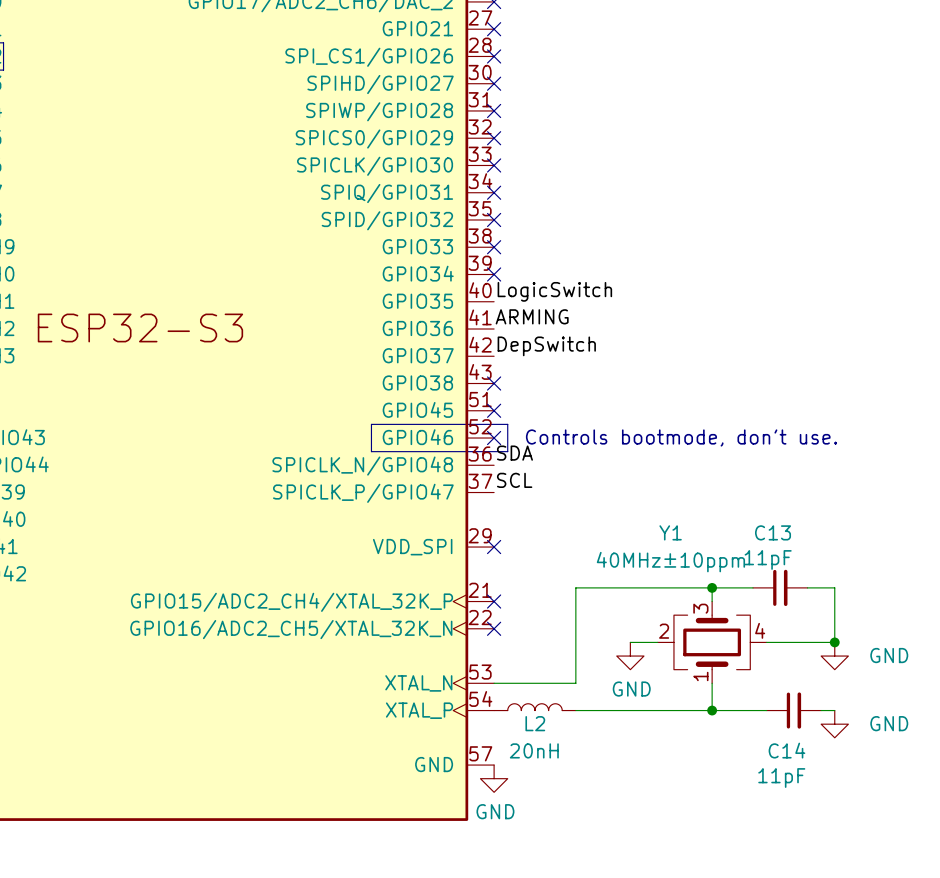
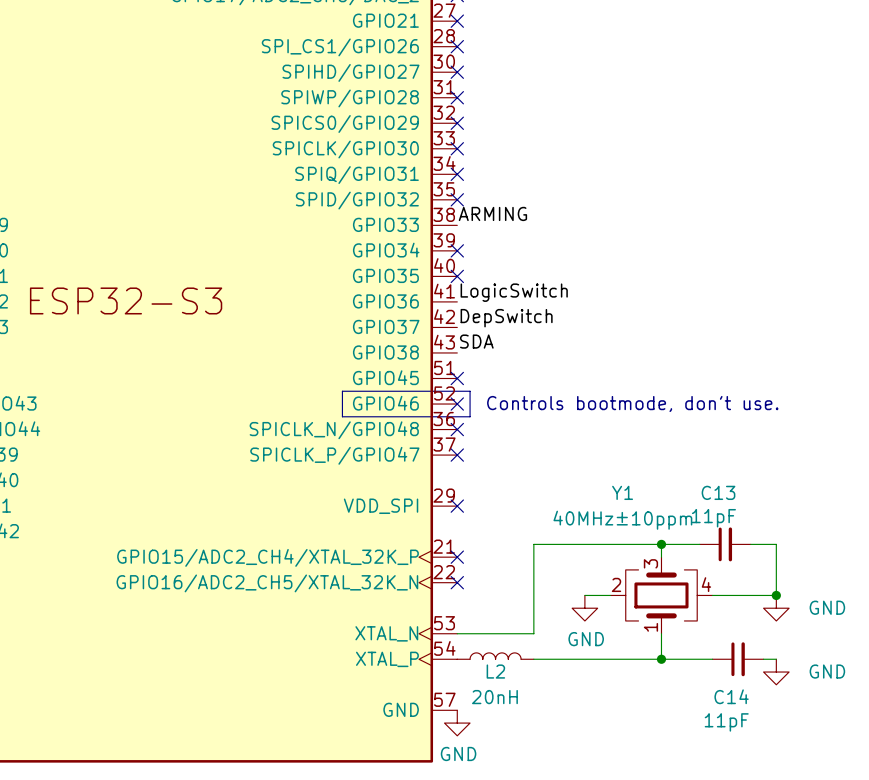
label: none -> ARMING (492, 213)
no-connect mark: (494, 247) -> none
label: LogicSwitch (554, 291) -> none
no-connect mark: none -> (457, 276)
label: ARMING (532, 316) -> LogicSwitch (514, 292)
no-connect mark: (494, 383) -> none
label position: SDA (514, 453) -> SDA (476, 341)
no-connect mark: none -> (457, 429)
label: SCL (514, 480) -> none
no-connect mark: none -> (457, 455)

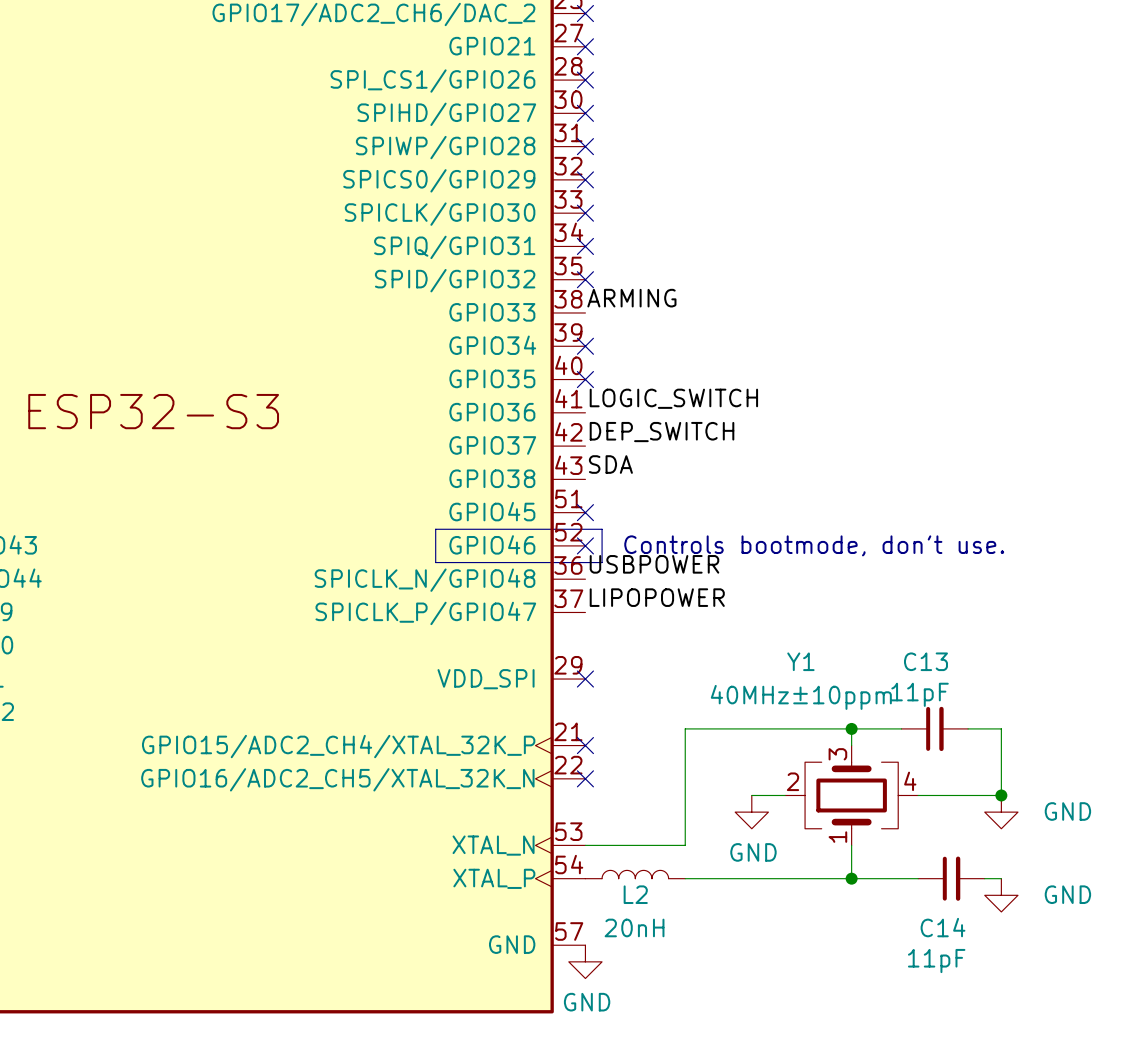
label: LogicSwitch (514, 292) -> LOGIC_SWITCH (673, 398)
label: DepSwitch (506, 318) -> DEP_SWITCH (662, 432)
label: none -> USBPOWER (654, 564)
no-connect mark: (457, 429) -> none
label: none -> LIPOPOWER (657, 597)
no-connect mark: (457, 455) -> none

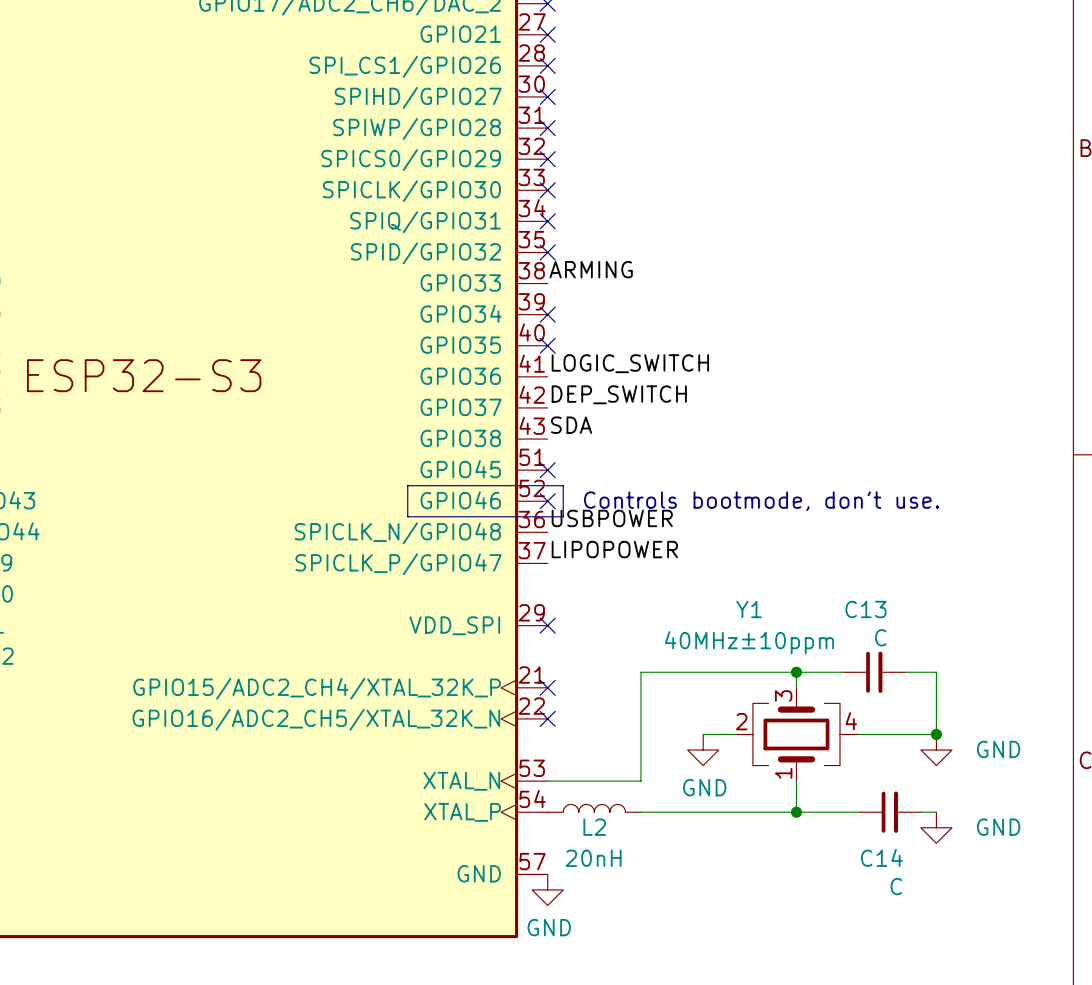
C13 value: 11pF (920, 694) -> C (880, 637)
C14 value: 11pF (936, 961) -> C (896, 886)

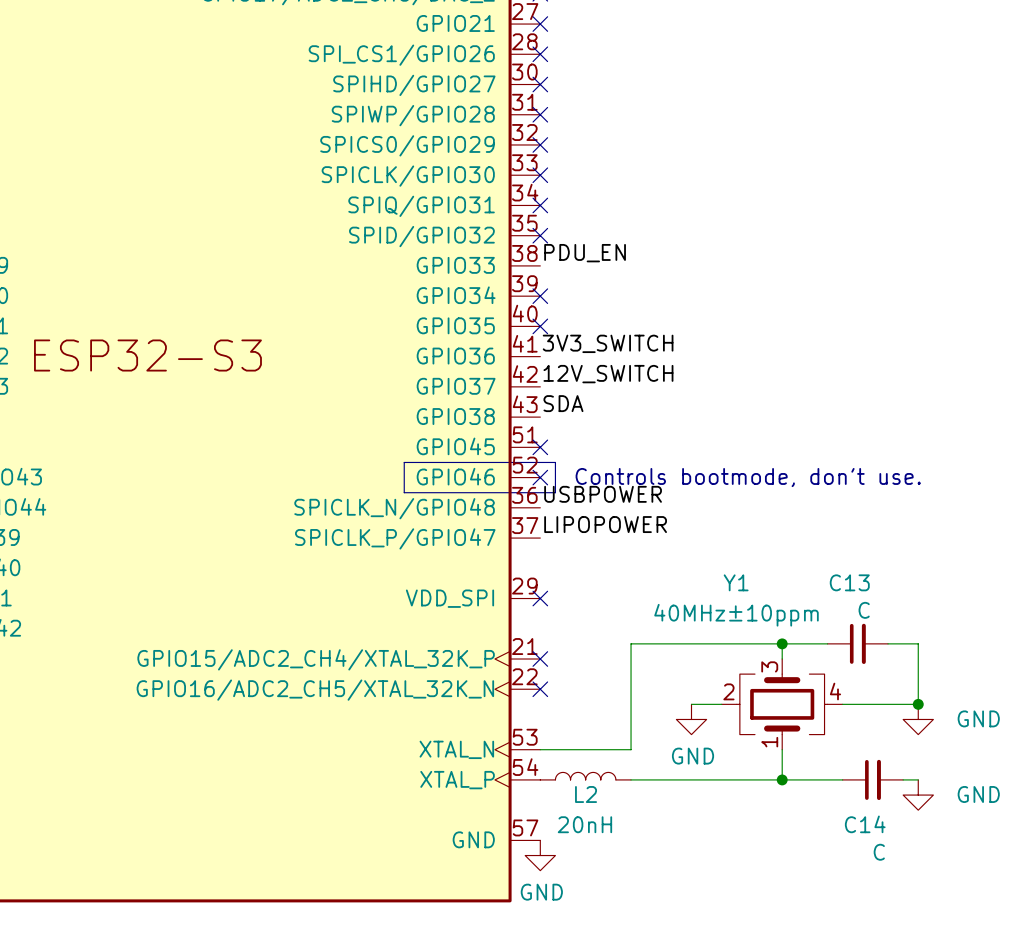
label: ARMING (591, 269) -> PDU_EN (585, 253)
label: LOGIC_SWITCH (630, 363) -> 3V3_SWITCH (608, 343)
label: DEP_SWITCH (619, 394) -> 12V_SWITCH (608, 374)

